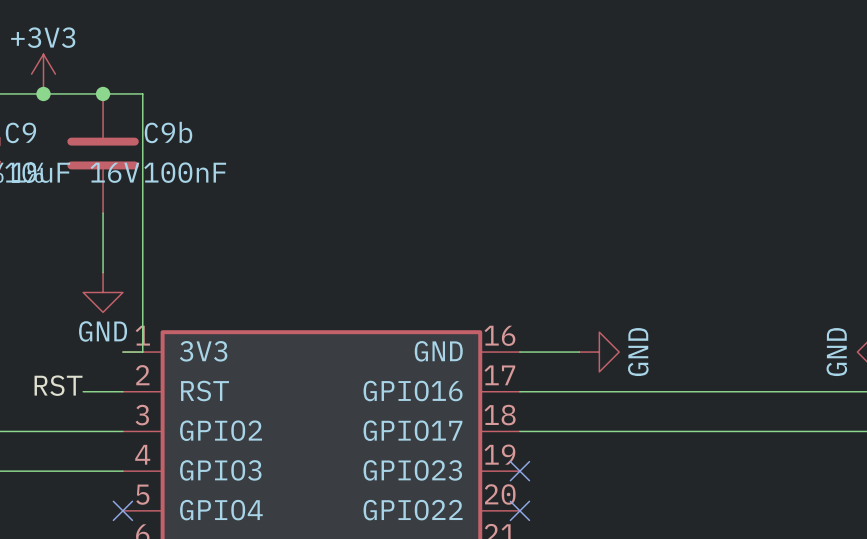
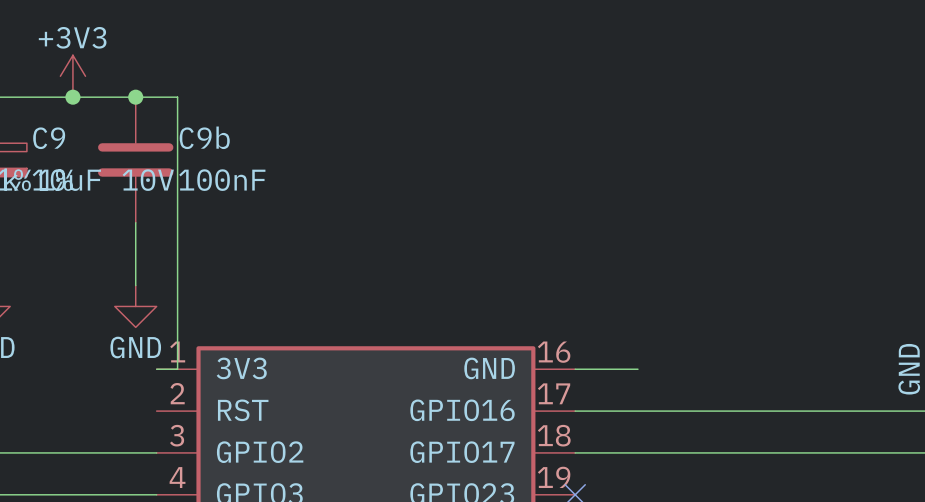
C9 value: 10uF 16V (72, 172) -> 10uF 10V (103, 180)
power symbol: GND (599, 352) -> none
label: RST (58, 385) -> none
wire: (83, 391) (122, 391) -> none

